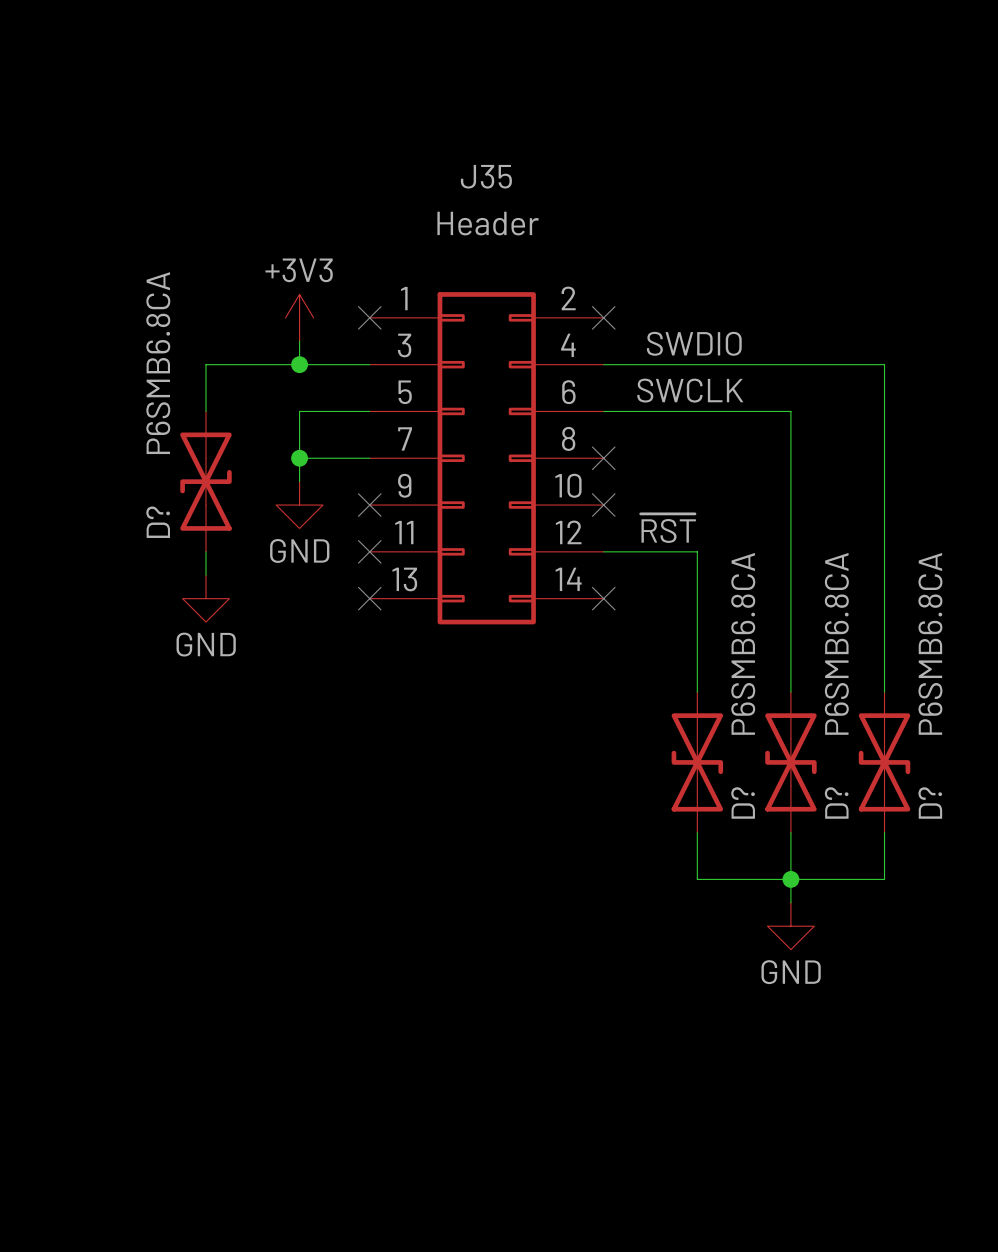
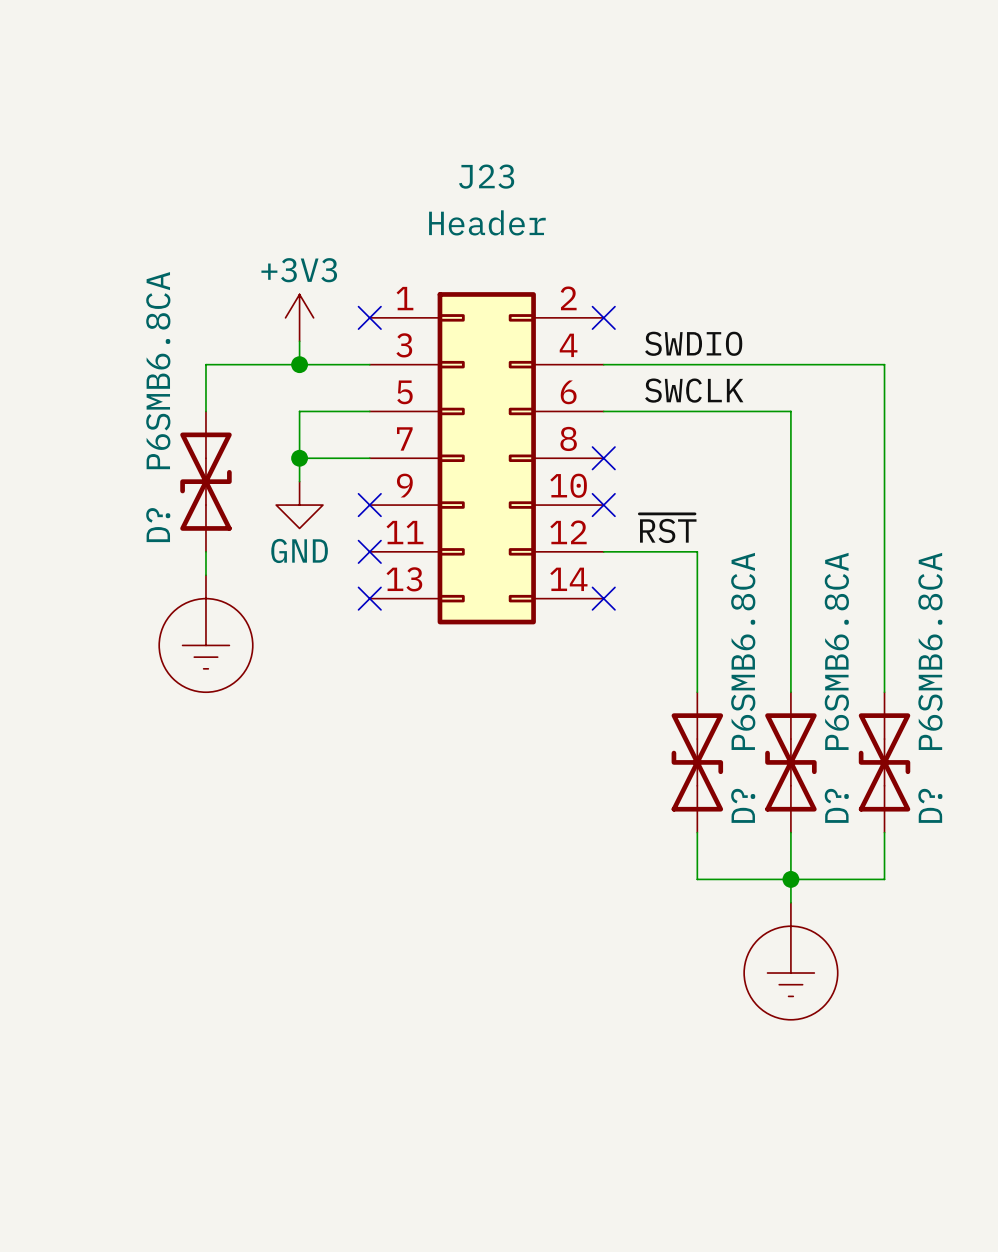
J35 name: J35 (486, 176) -> J23 (486, 176)
power symbol: GND (205, 598) -> none
power symbol: none -> (205, 633)
power symbol: GND (790, 926) -> none
power symbol: none -> (790, 961)

